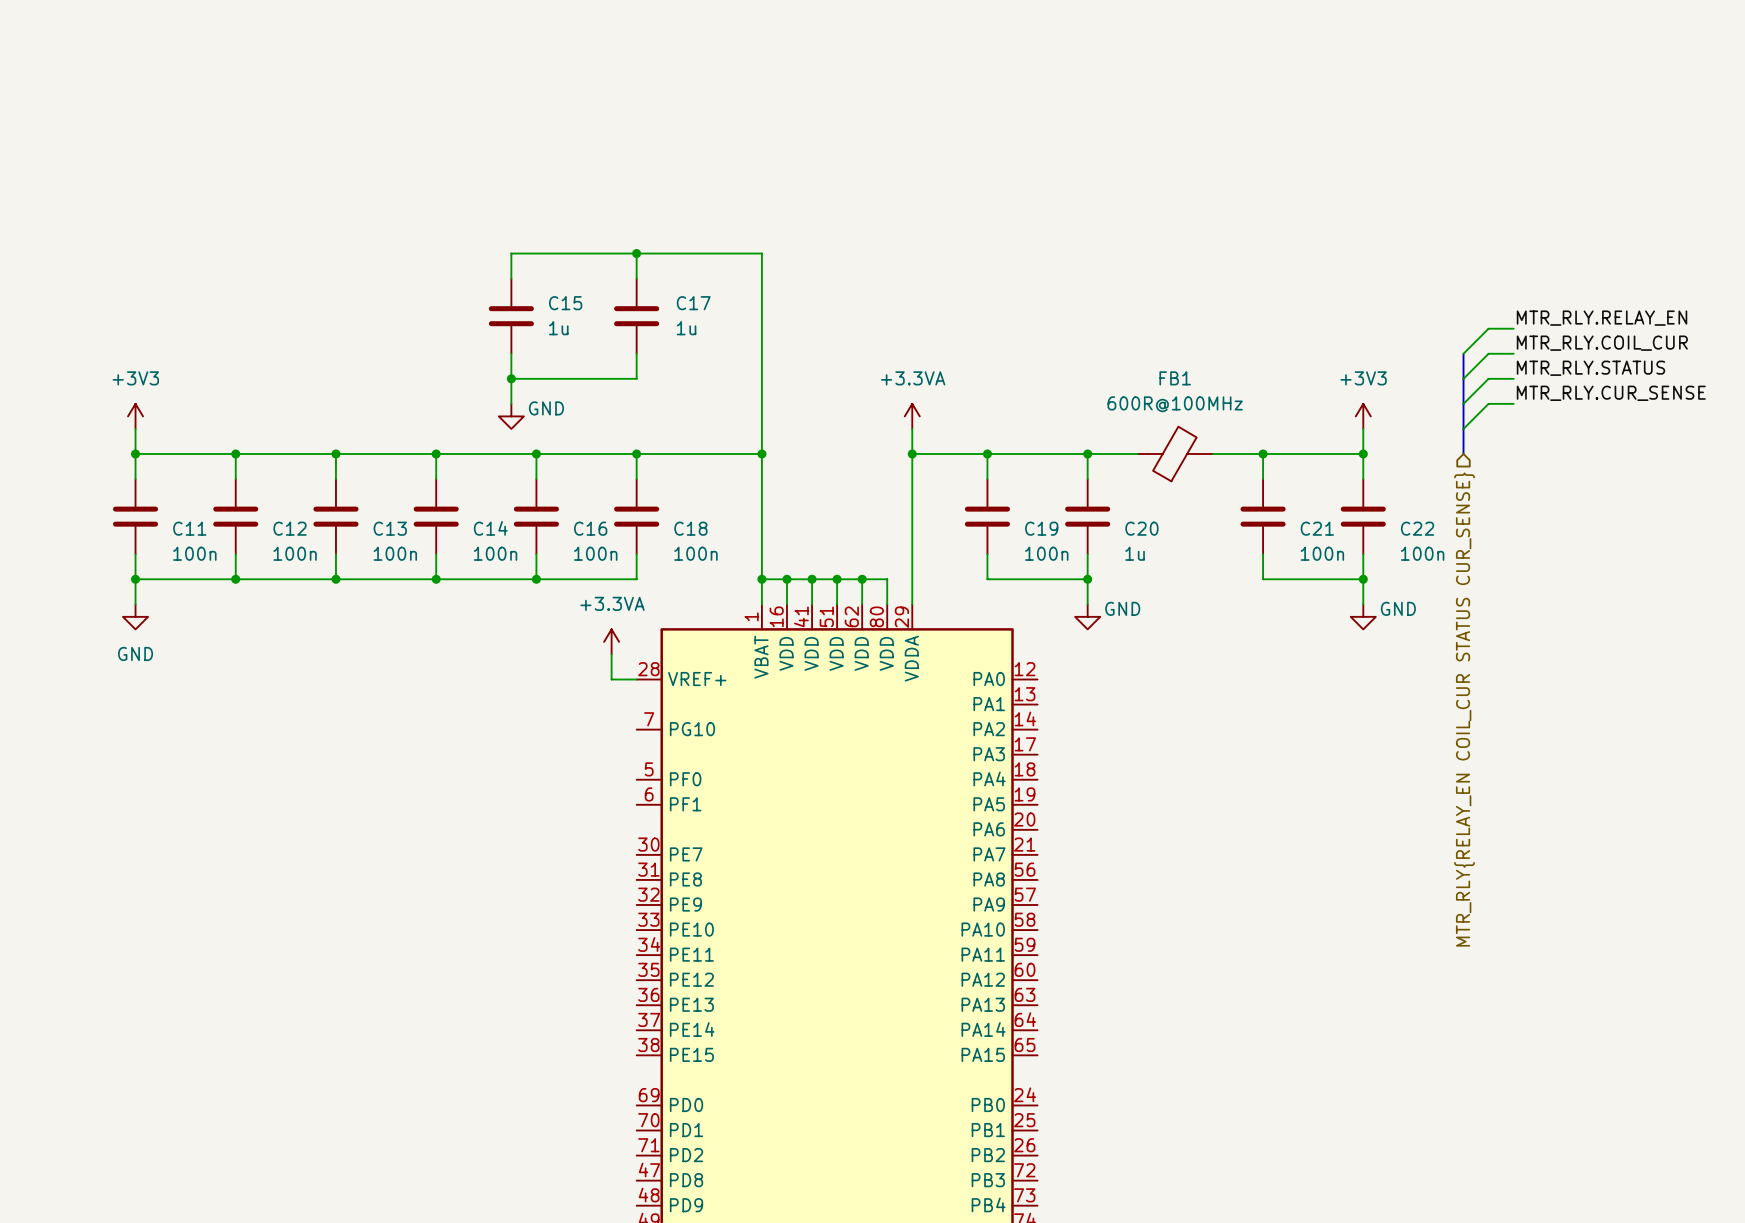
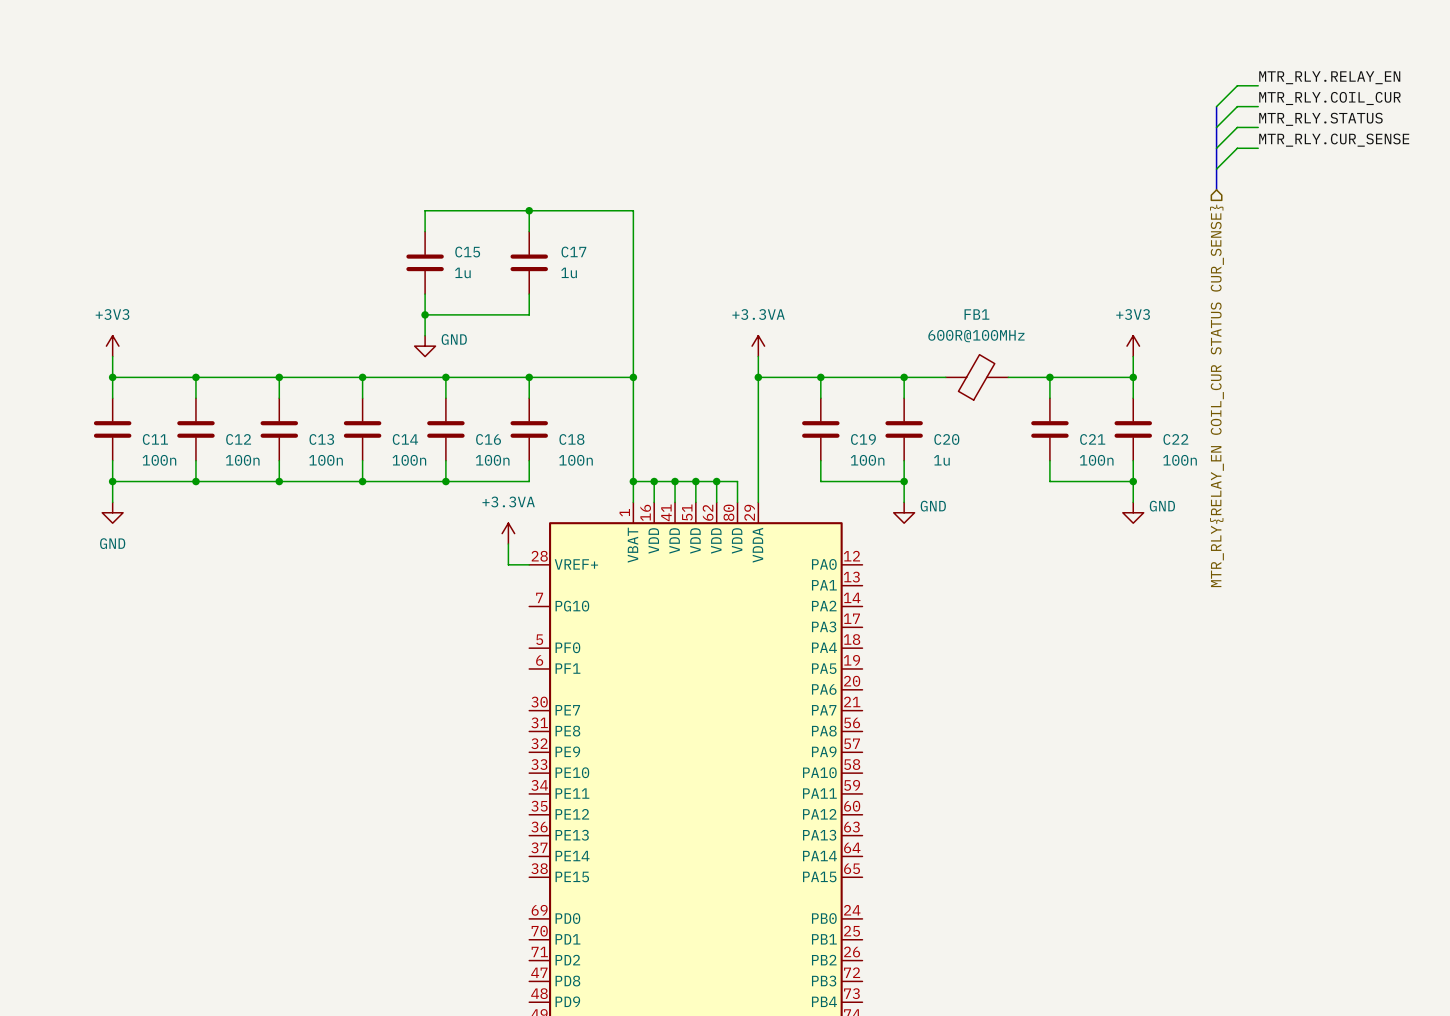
wire: none -> (1258, 85) (1237, 85) (1216, 106)
wire: none -> (1258, 106) (1237, 106) (1216, 127)
label position: MTR_RLY.RELAY_EN (1602, 318) -> MTR_RLY.RELAY_EN (1329, 77)
wire: (1513, 328) (1488, 328) (1463, 353) -> (1258, 148) (1237, 148) (1216, 169)
label position: MTR_RLY.COIL_CUR (1602, 343) -> MTR_RLY.COIL_CUR (1329, 98)
bus: (1463, 353) (1463, 453) -> (1216, 106) (1216, 189)
wire: (1513, 353) (1488, 353) (1463, 378) -> (1258, 127) (1237, 127) (1216, 148)
label position: MTR_RLY.STATUS (1590, 368) -> MTR_RLY.STATUS (1320, 119)
wire: (1513, 378) (1488, 378) (1463, 403) -> none
label position: MTR_RLY.CUR_SENSE (1611, 393) -> MTR_RLY.CUR_SENSE (1334, 140)
wire: (1513, 403) (1488, 403) (1463, 428) -> none
hierarchical label position: MTR_RLY{RELAY_EN COIL_CUR STATUS CUR_SENSE} (1464, 709) -> MTR_RLY{RELAY_EN COIL_CUR STATUS CUR_SENSE} (1216, 395)

